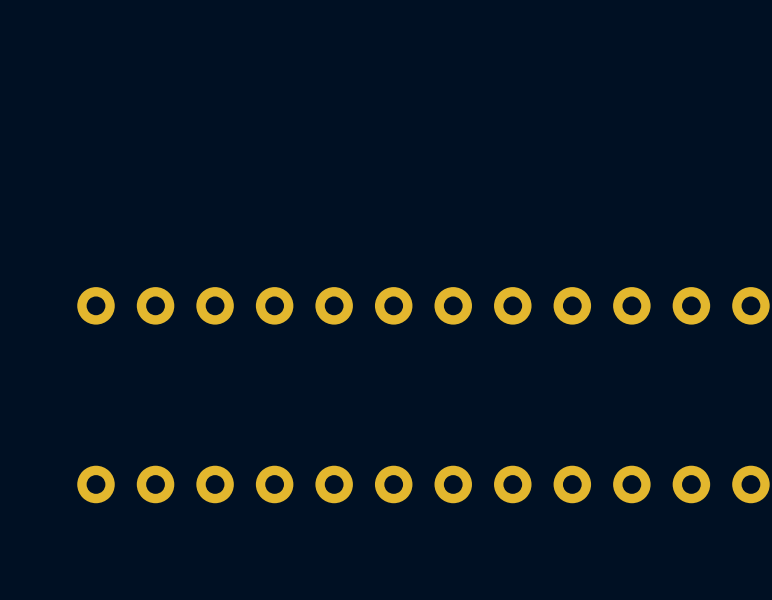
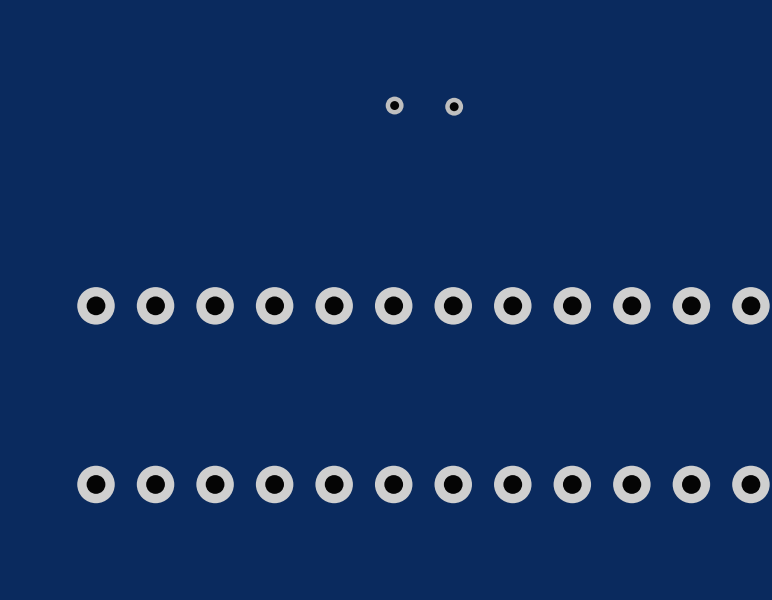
via: none -> (394, 105)
via: none -> (454, 106)

